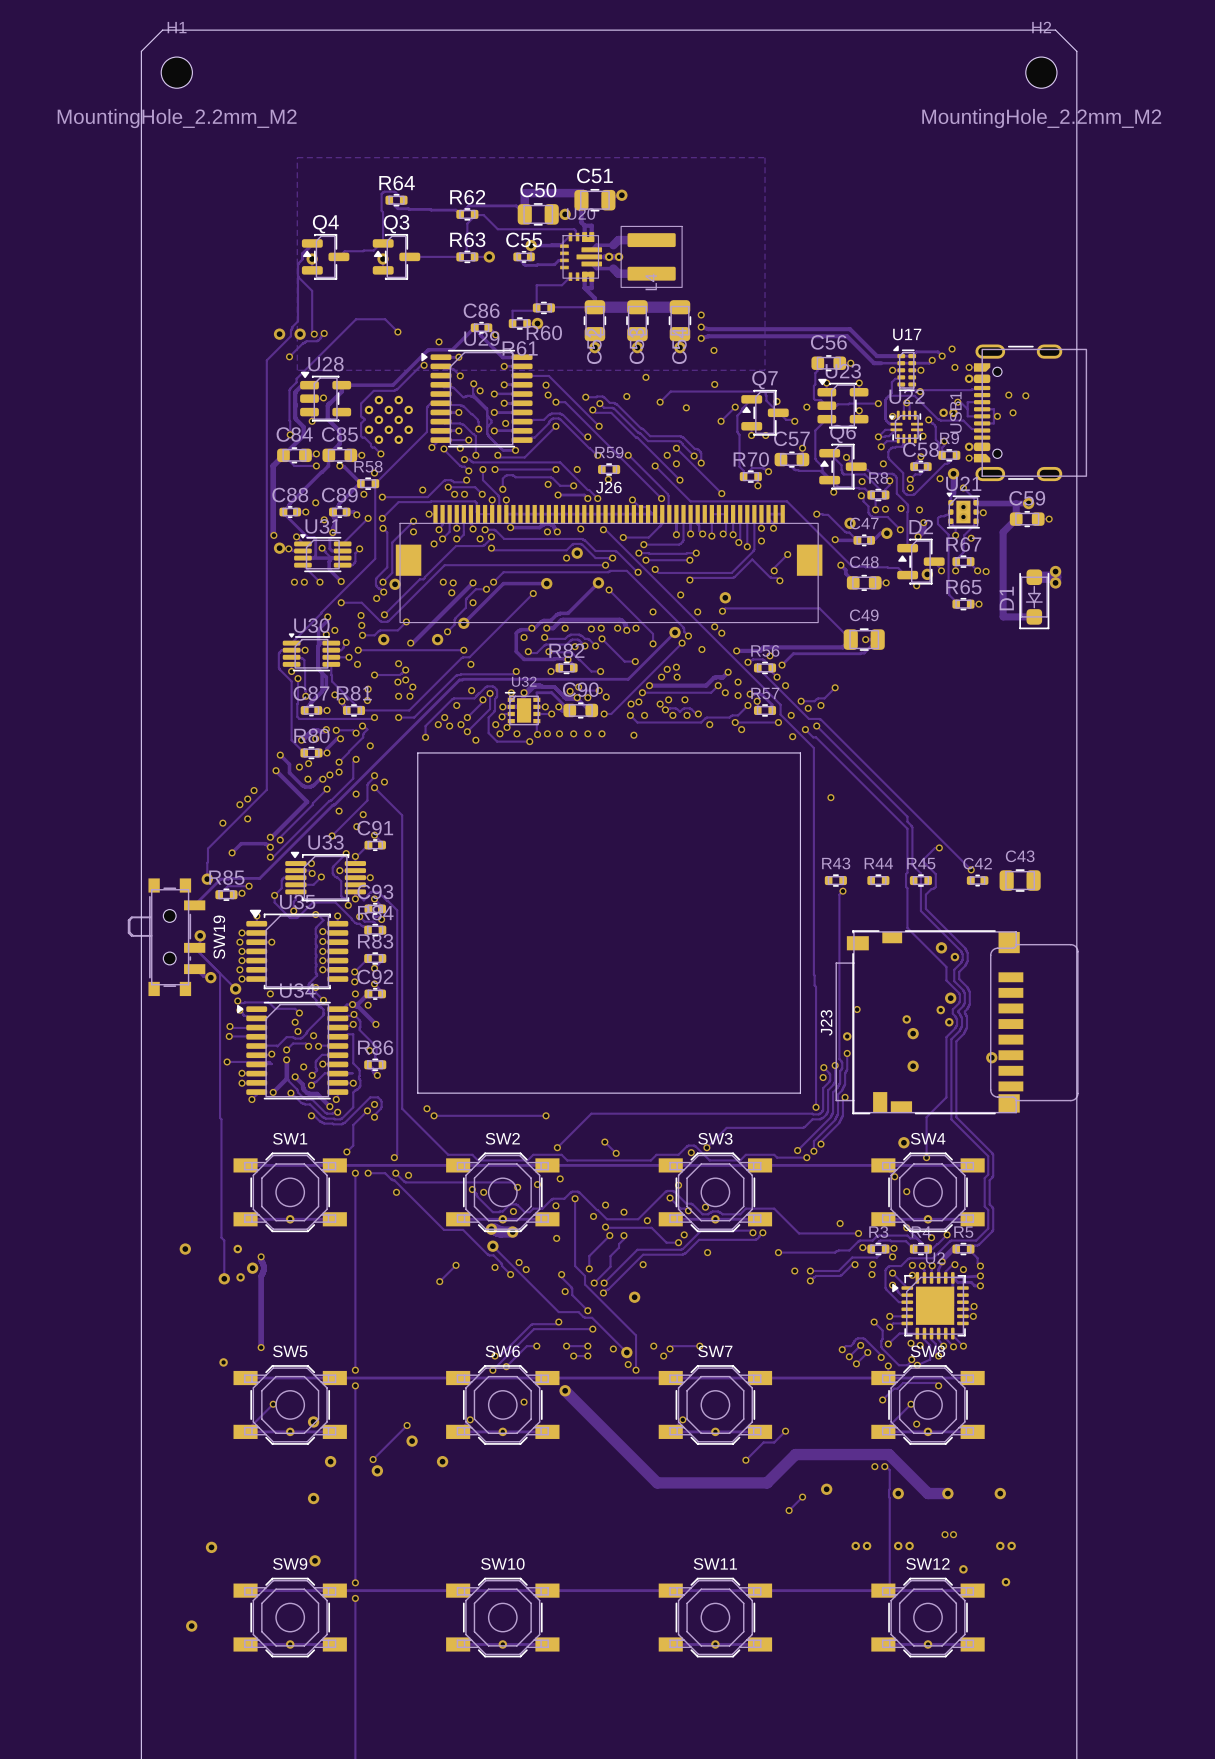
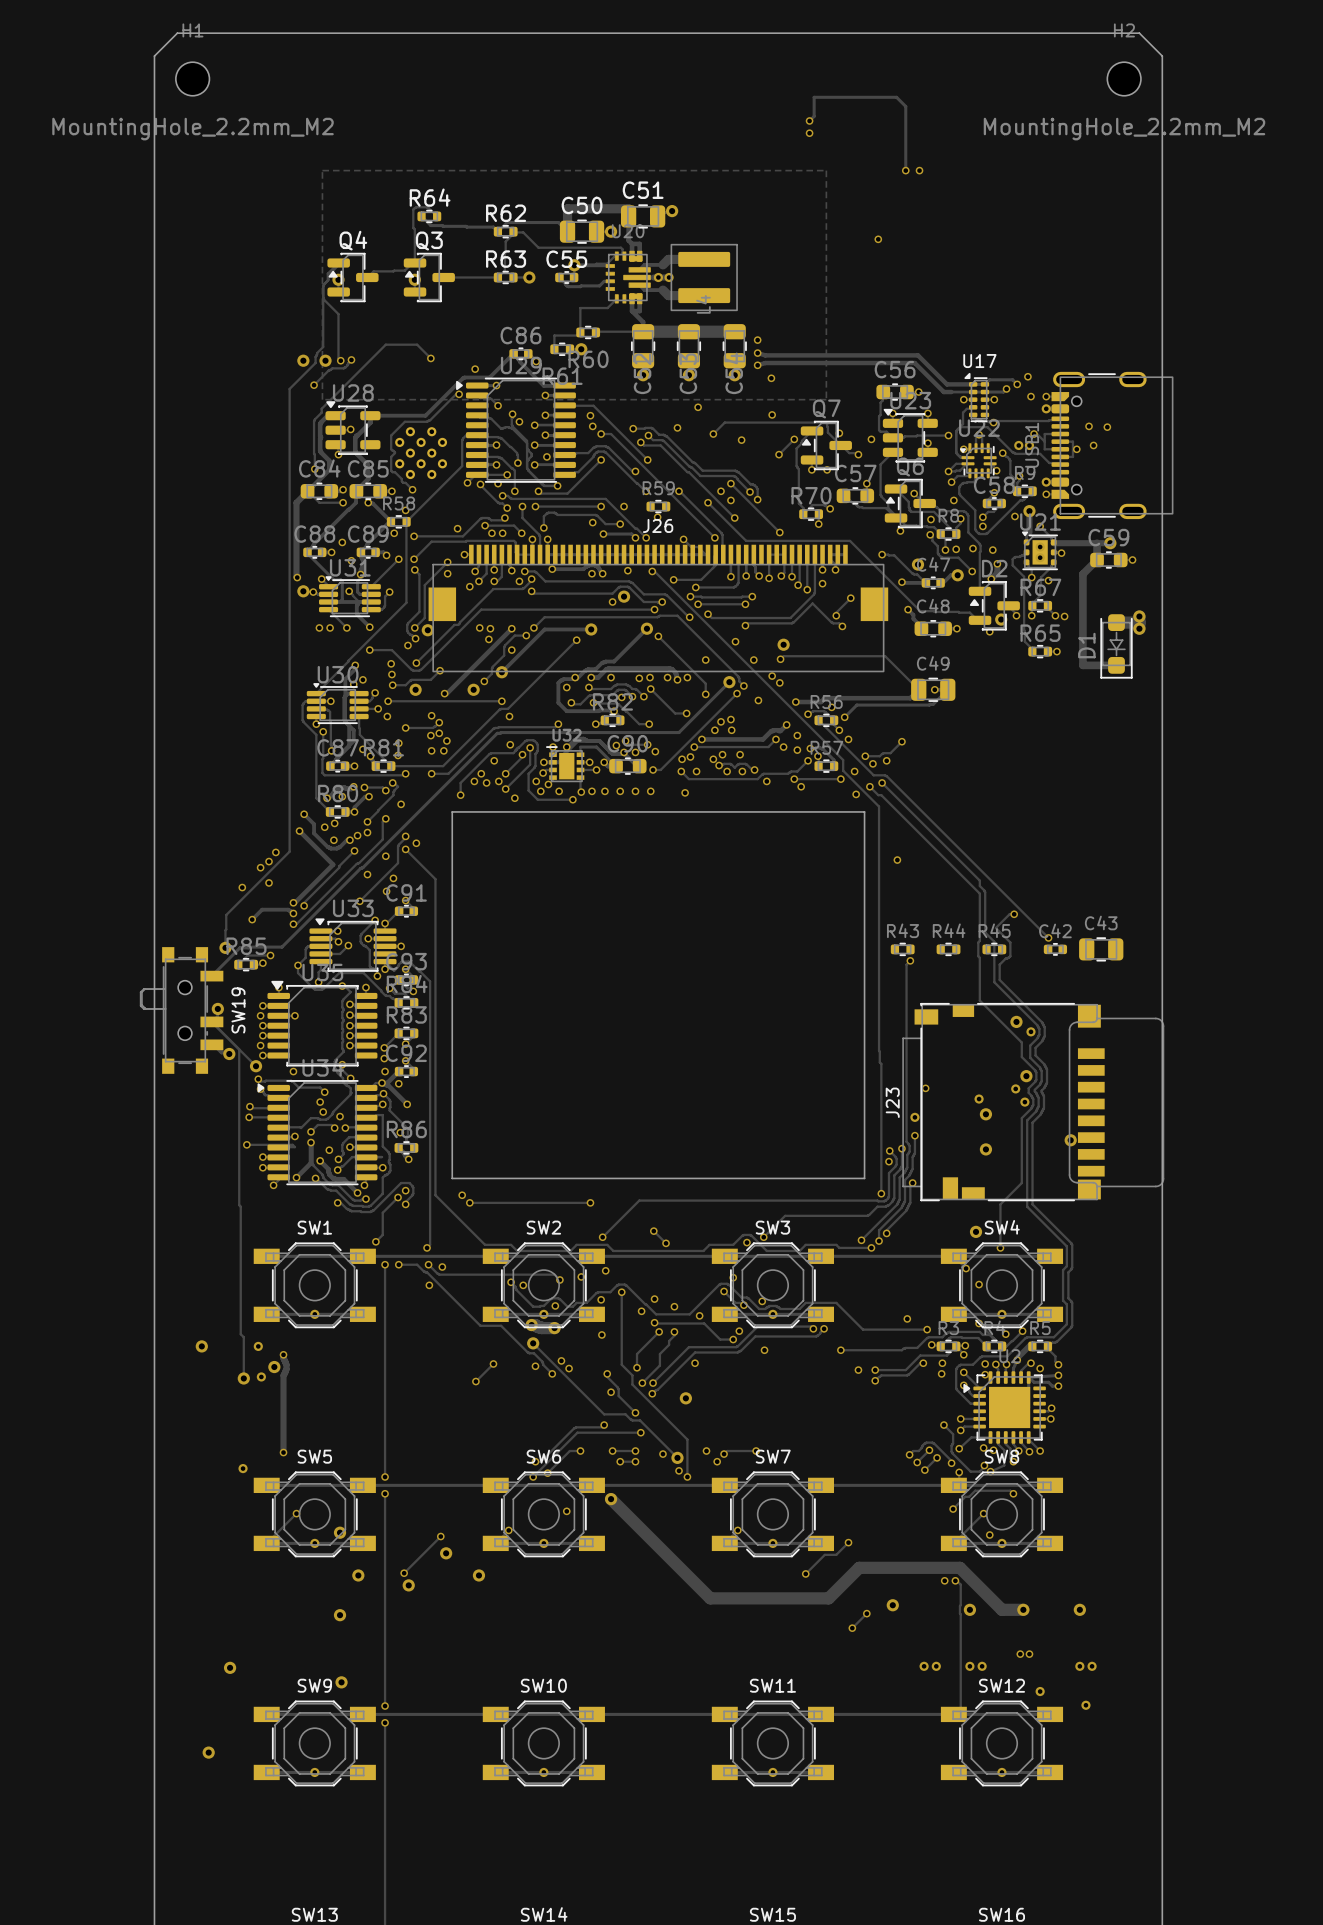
track: none -> (809, 120) (814, 116) (814, 97) (896, 97) (905, 106) (905, 170)
via: none -> (809, 120)
via: none -> (809, 133)
via: none -> (905, 170)
via: none -> (919, 170)
via: none -> (878, 239)

